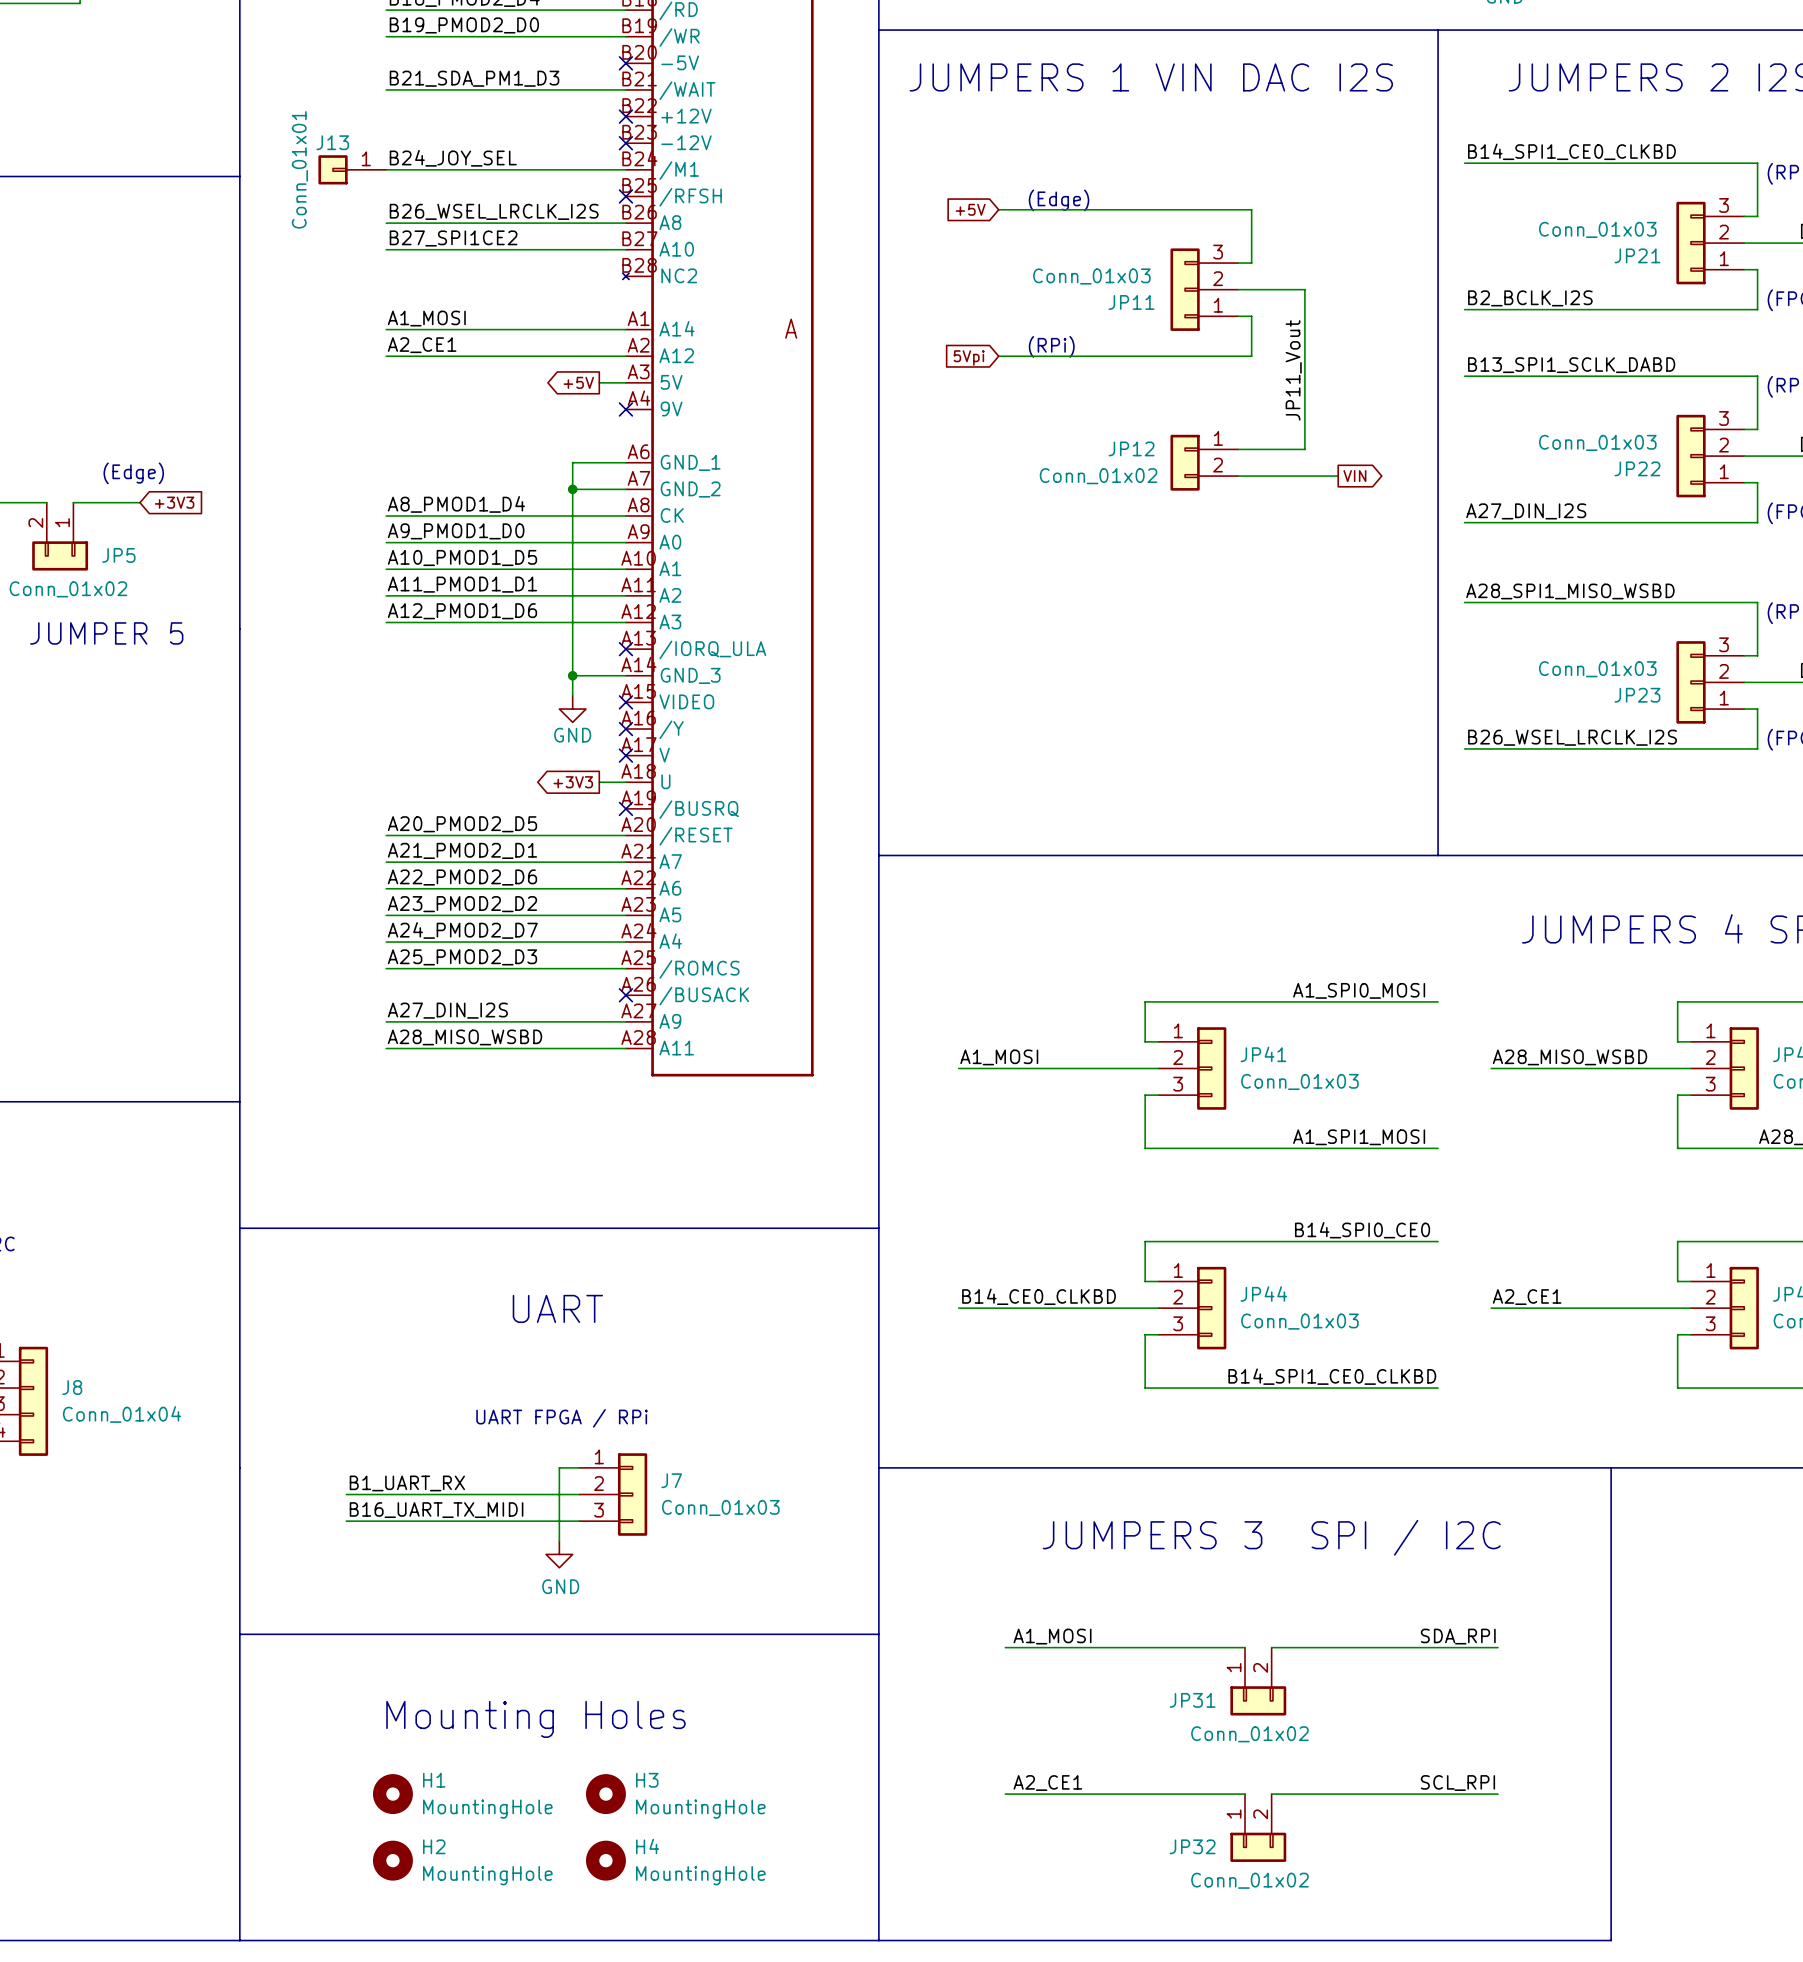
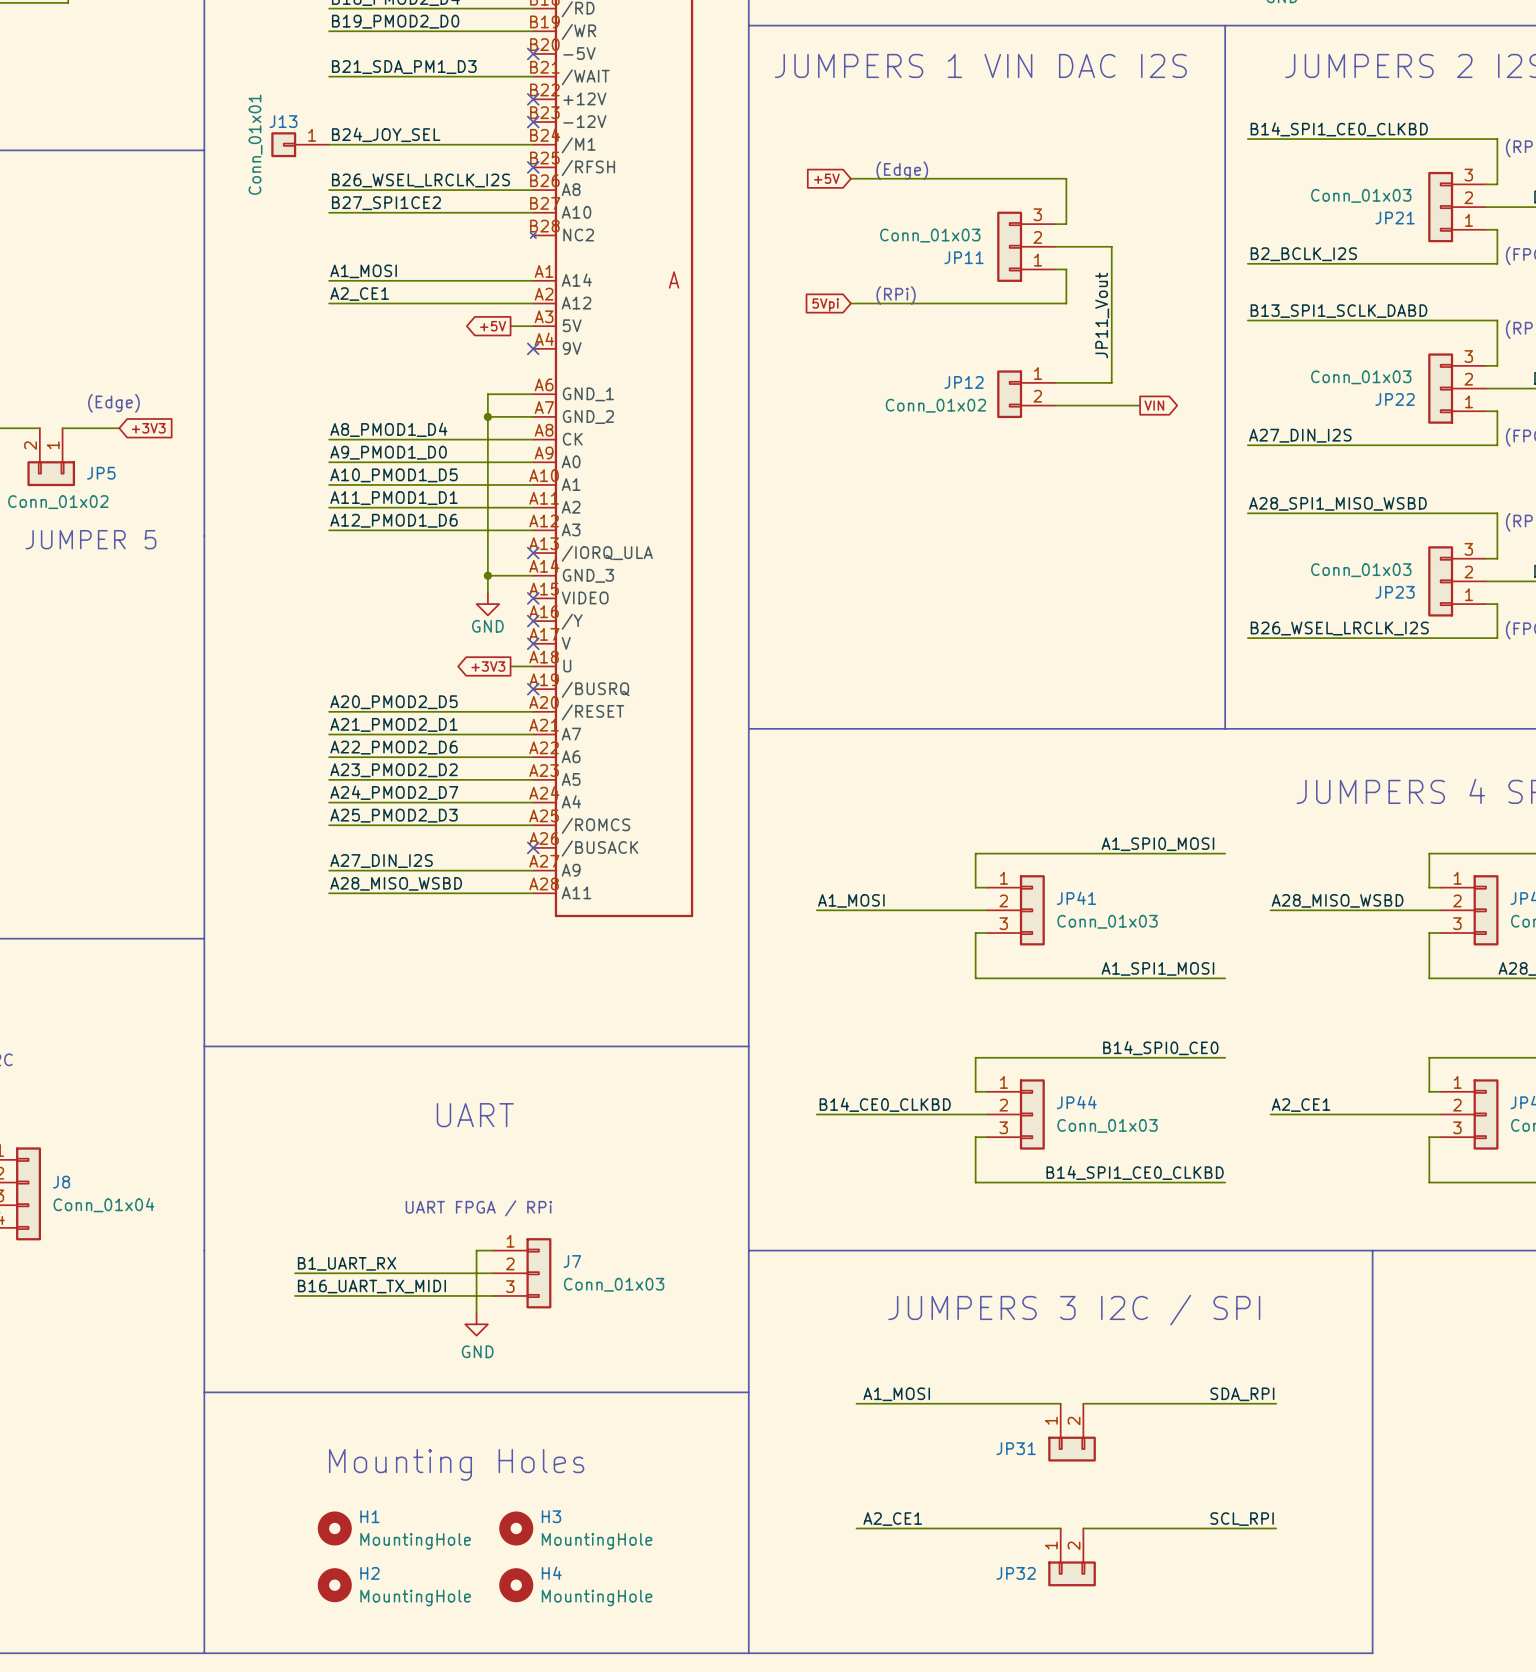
text: JUMPERS 3 SPI / I2C (1271, 1537) -> JUMPERS 3 I2C / SPI (1074, 1310)
JP31 value: Conn_01x02 (1249, 1734) -> none
JP32 value: Conn_01x02 (1249, 1880) -> none

